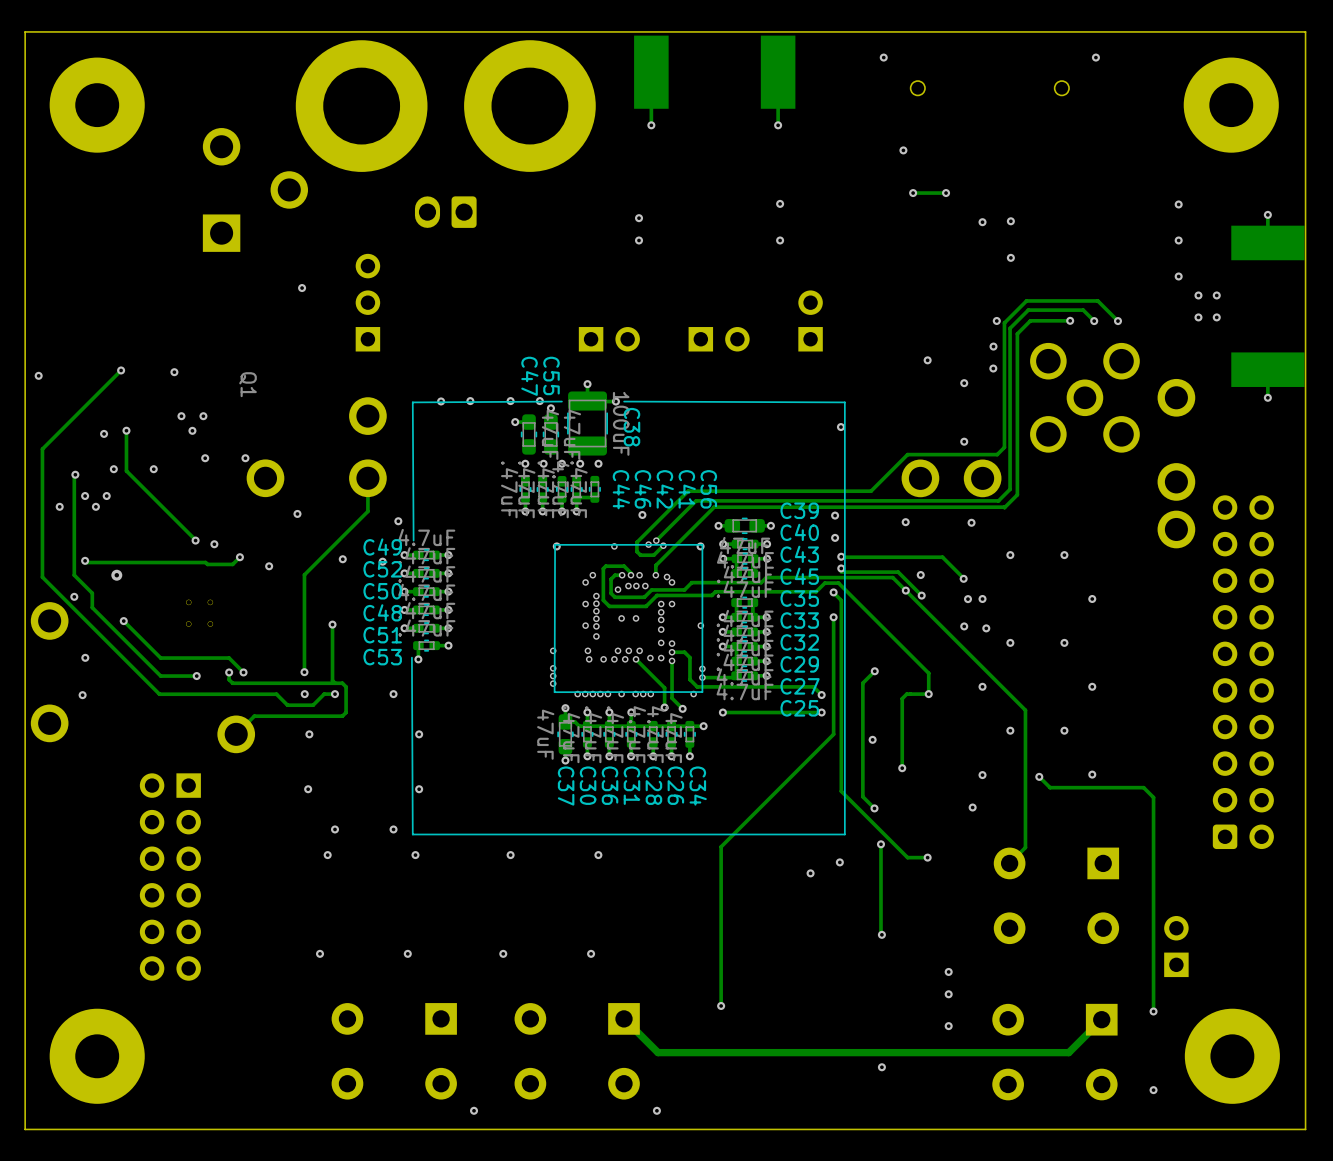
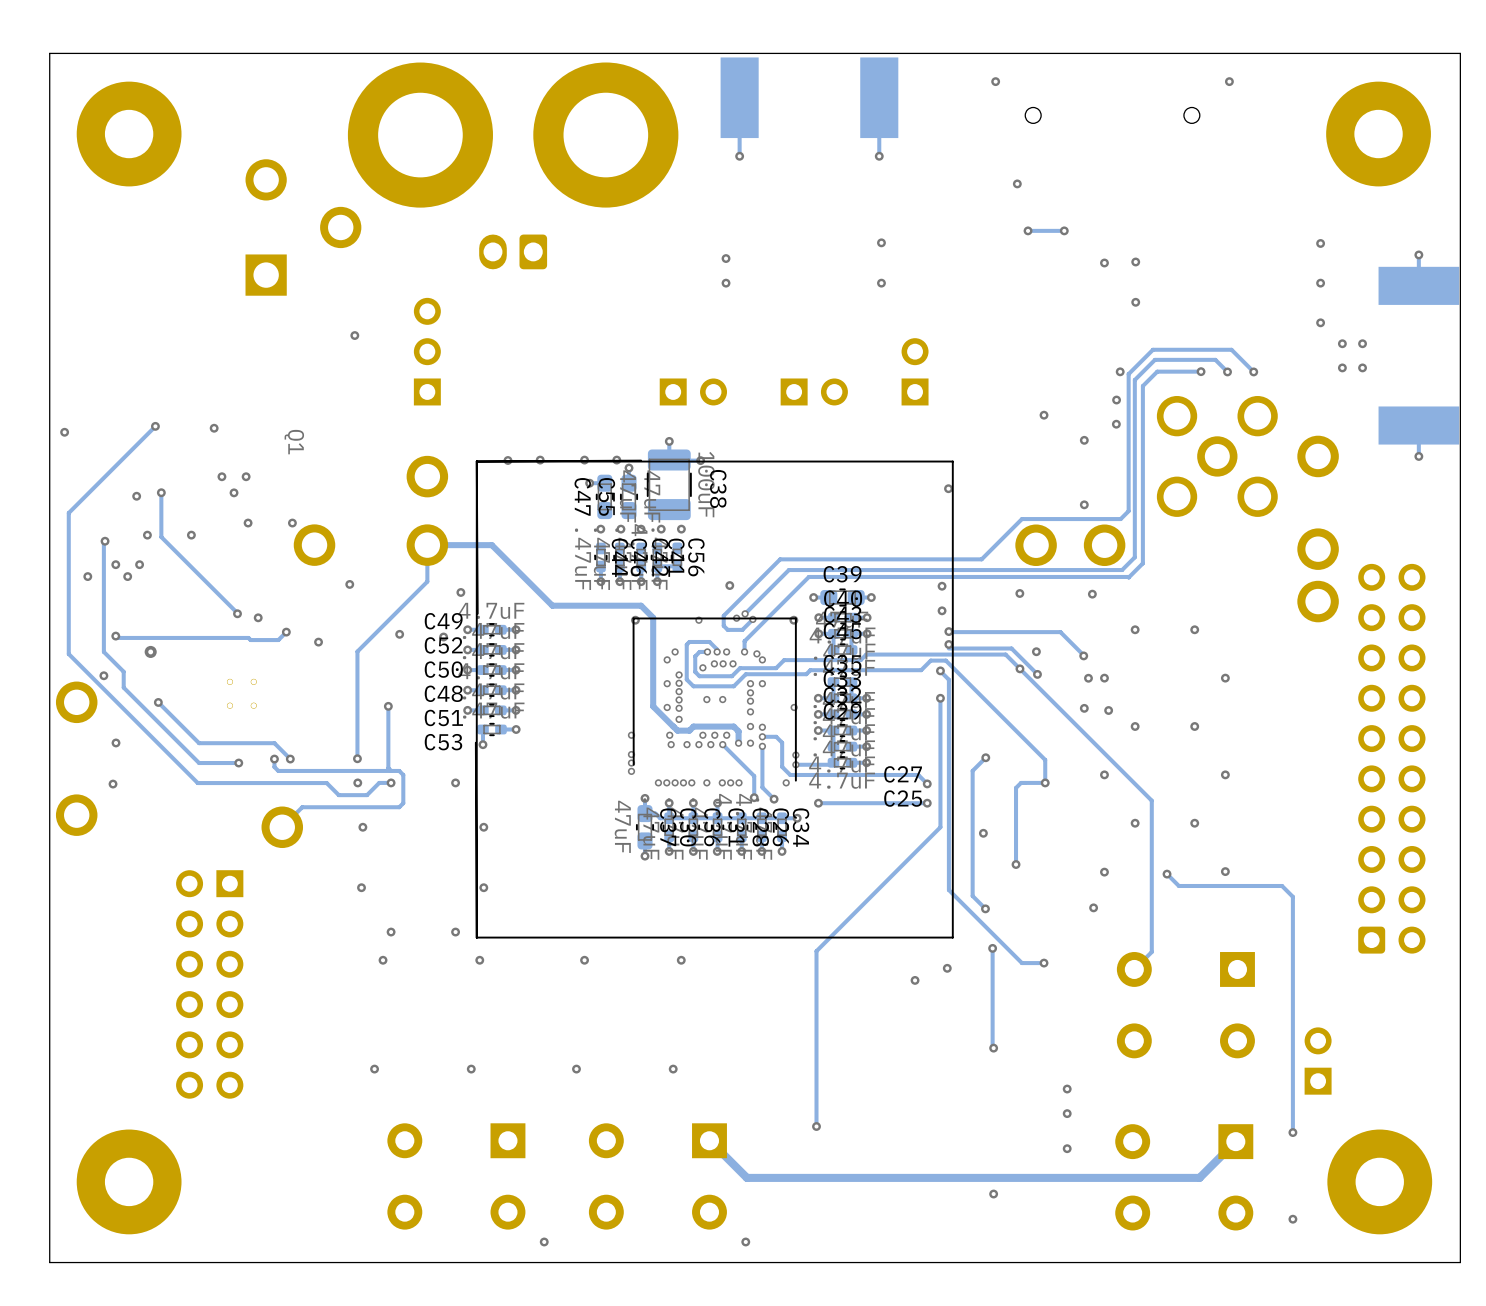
C55 name position: C55 (551, 375) -> C55 (606, 496)
C47 name position: C47 (529, 376) -> C47 (582, 496)
line: (624, 401) (844, 402) -> (476, 937) (476, 461) (952, 461)
track: none -> (427, 545) (491, 545) (552, 605) (641, 605) (653, 617) (653, 706) (673, 726)
C44 name position: C44 (621, 489) -> C44 (619, 557)
C46 name position: C46 (643, 489) -> C46 (638, 557)
C42 name position: C42 (665, 489) -> C42 (660, 557)
C41 name position: C41 (687, 489) -> C41 (676, 557)
C56 name position: C56 (708, 489) -> C56 (696, 557)
C39 name position: C39 (799, 510) -> C39 (842, 574)
C40 name position: C40 (799, 532) -> C40 (843, 598)
line: (555, 544) (554, 692) (702, 692) -> (633, 618) (633, 764)
C43 name position: C43 (799, 554) -> C43 (842, 614)
C45 name position: C45 (799, 576) -> C45 (842, 631)
C35 name position: C35 (799, 598) -> C35 (842, 663)
C33 name position: C33 (799, 620) -> C33 (842, 679)
C32 name position: C32 (799, 642) -> C32 (842, 695)
track: none -> (673, 726) (677, 730) (689, 730) (693, 726) (733, 726) (738, 731) (738, 743)
C29 name position: C29 (799, 664) -> C29 (842, 711)
C30 name position: C30 (588, 785) -> C30 (688, 827)
C36 name position: C36 (610, 785) -> C36 (712, 827)
C31 name position: C31 (631, 785) -> C31 (736, 827)
C28 name position: C28 (653, 785) -> C28 (760, 827)
C26 name position: C26 (675, 785) -> C26 (780, 827)
C37 name position: C37 (566, 786) -> C37 (668, 827)
C34 name position: C34 (698, 786) -> C34 (801, 827)

